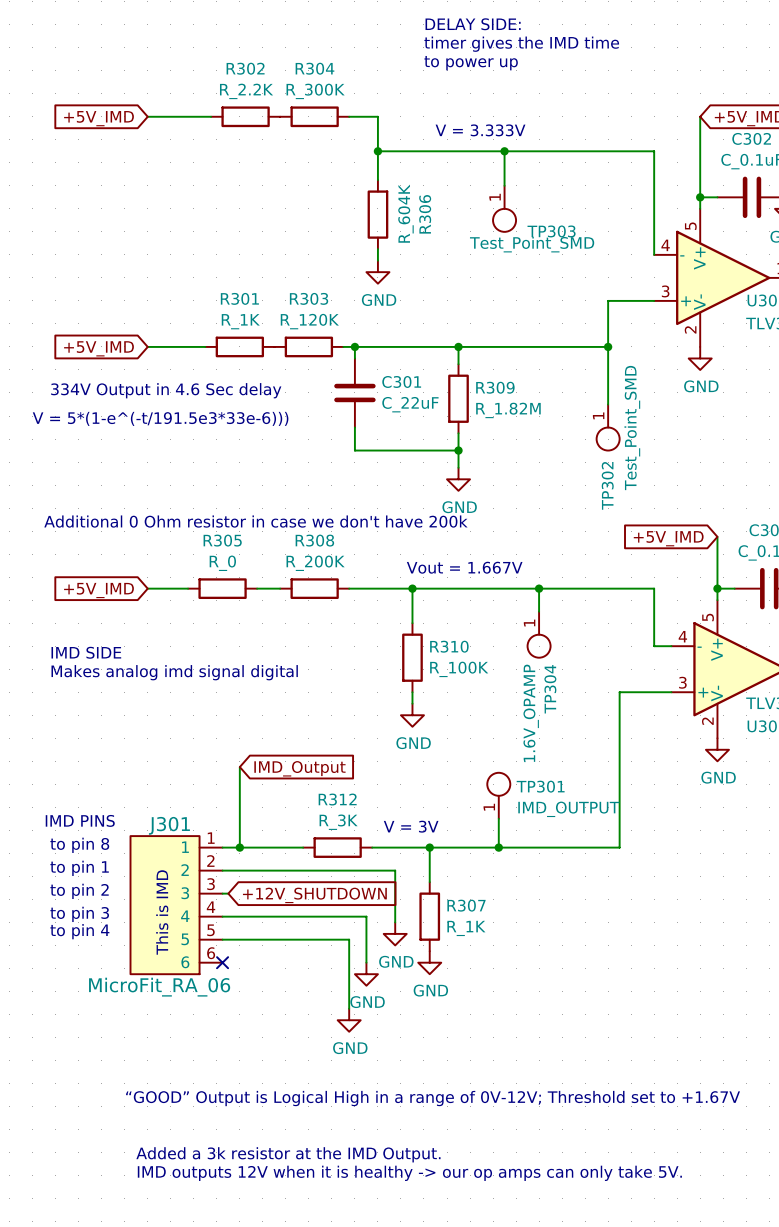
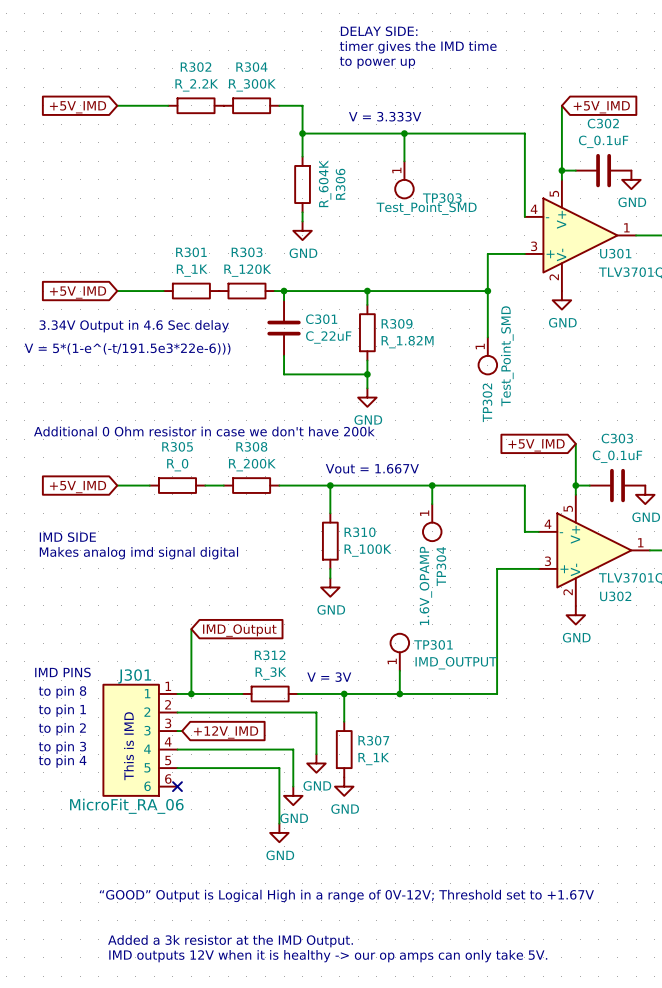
text: 334V Output in 4.6 Sec delay (166, 390) -> 3.34V Output in 4.6 Sec delay (134, 326)
text: V = 5*(1-e^(-t/191.5e3*33e-6))) (160, 418) -> V = 5*(1-e^(-t/191.5e3*22e-6))) (127, 348)
global label: +12V_SHUTDOWN (314, 895) -> +12V_IMD (226, 732)

